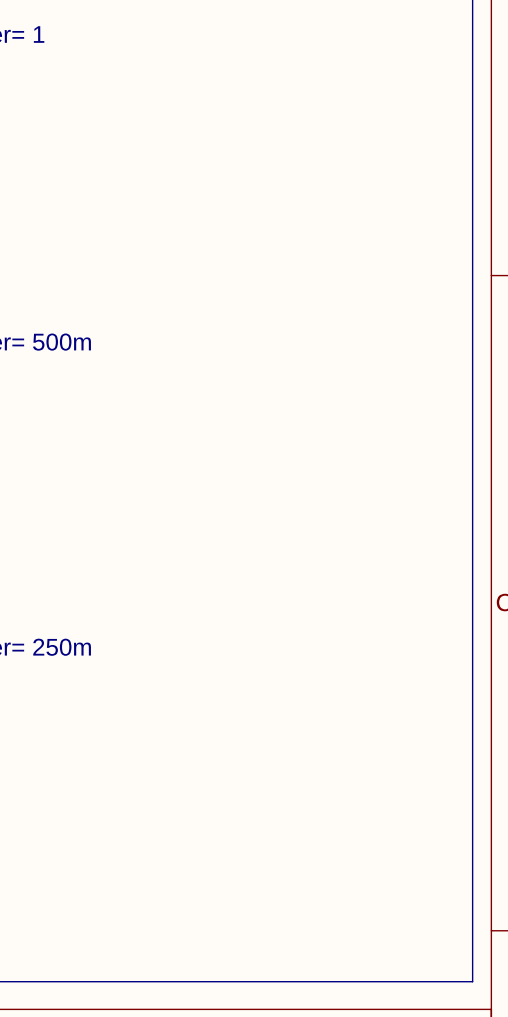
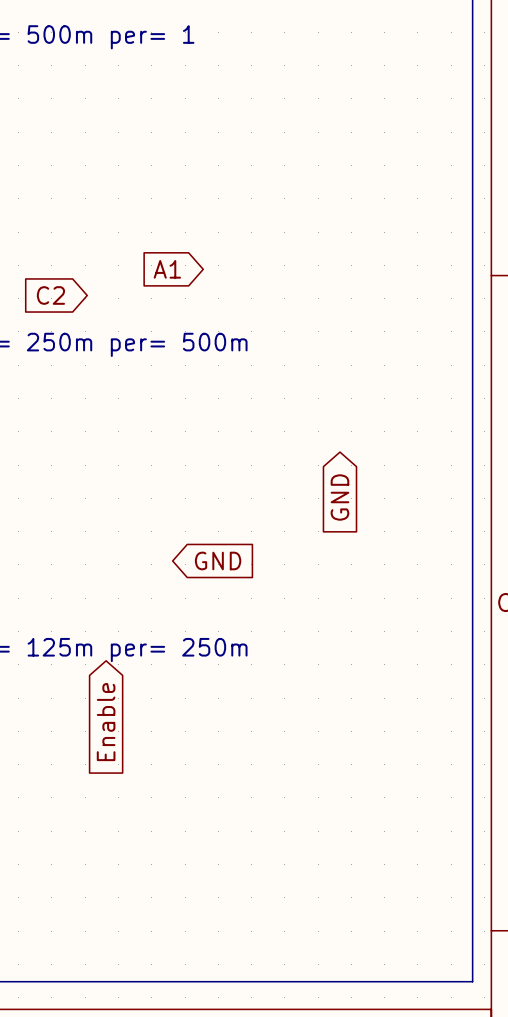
global label: none -> A1 (167, 269)
global label: none -> C2 (50, 295)
global label: none -> GND (339, 497)
global label: none -> GND (218, 560)
global label: none -> Enable (106, 722)

